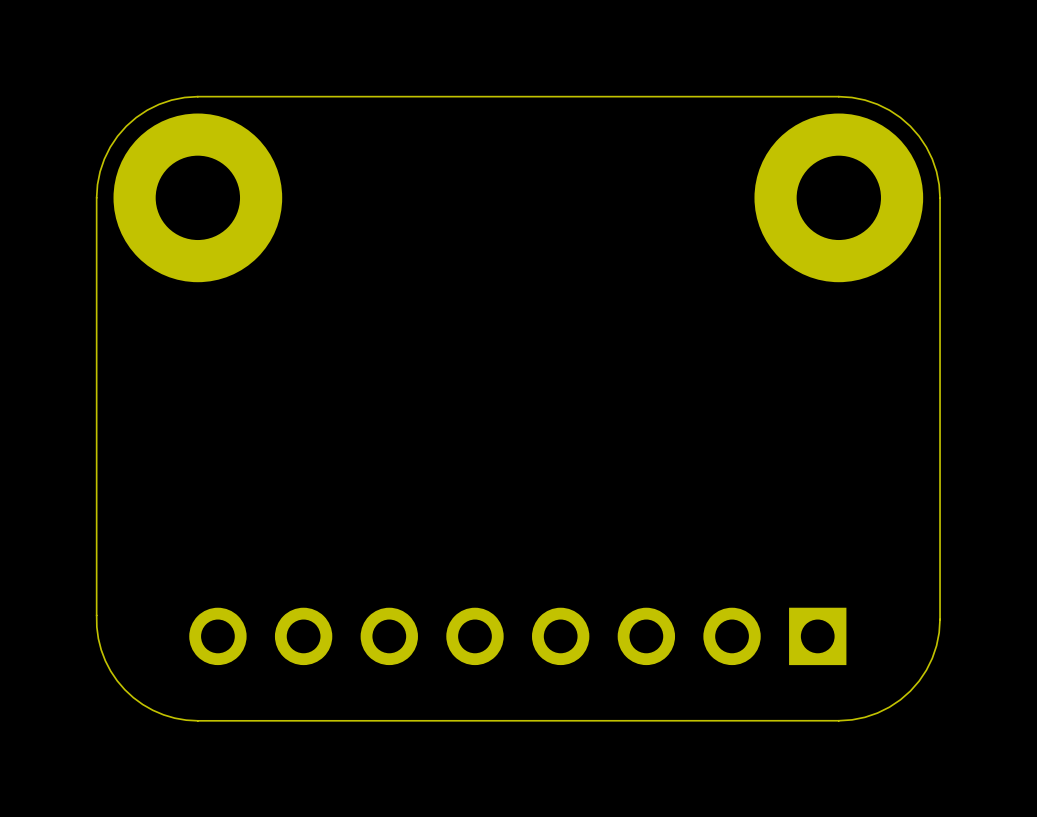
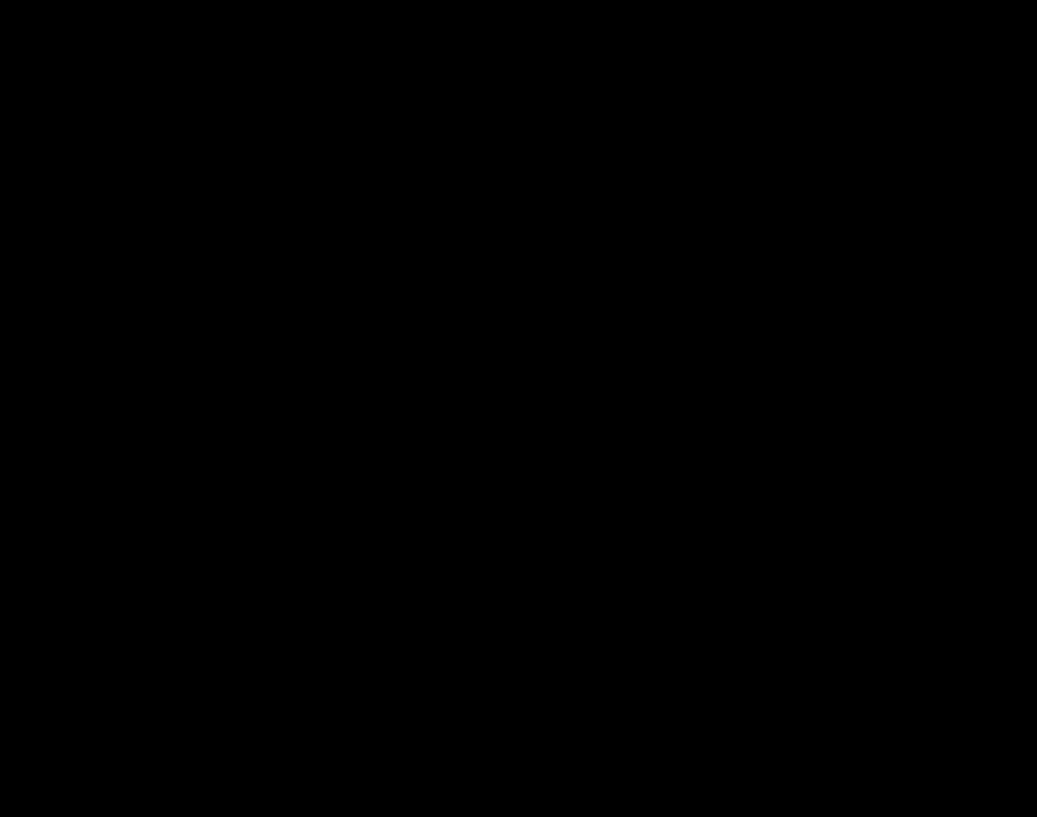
board edge: (838, 96) (197, 96) (184, 97) (159, 104) (136, 117) (117, 136) (110, 147) (100, 171) (96, 197) (96, 627) (101, 649) (117, 680) (133, 697) (152, 710) (174, 718) (197, 720) (838, 720) (852, 719) (877, 713) (900, 699) (910, 691) (926, 670) (932, 658) (939, 632) (939, 184) (936, 171) (926, 147) (910, 126) (900, 117) (877, 104) (865, 100) (838, 96) -> none
part: (197, 197) -> none
part: (838, 197) -> none
part: (517, 636) -> none

